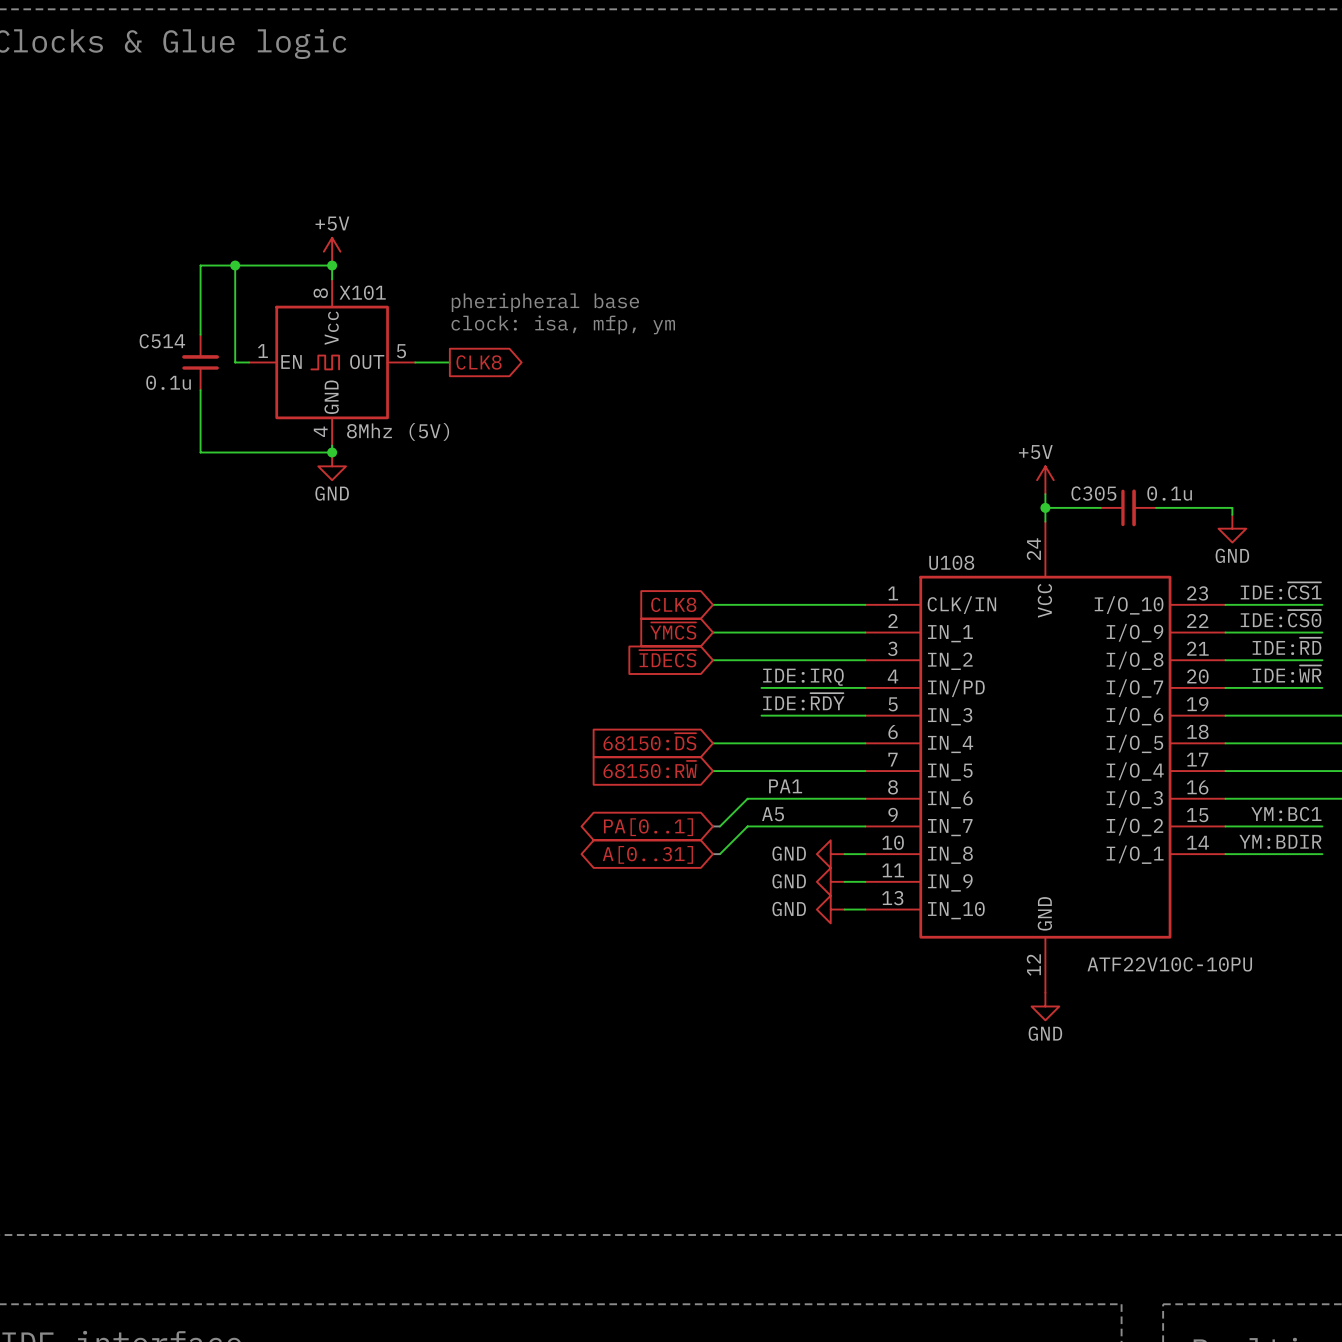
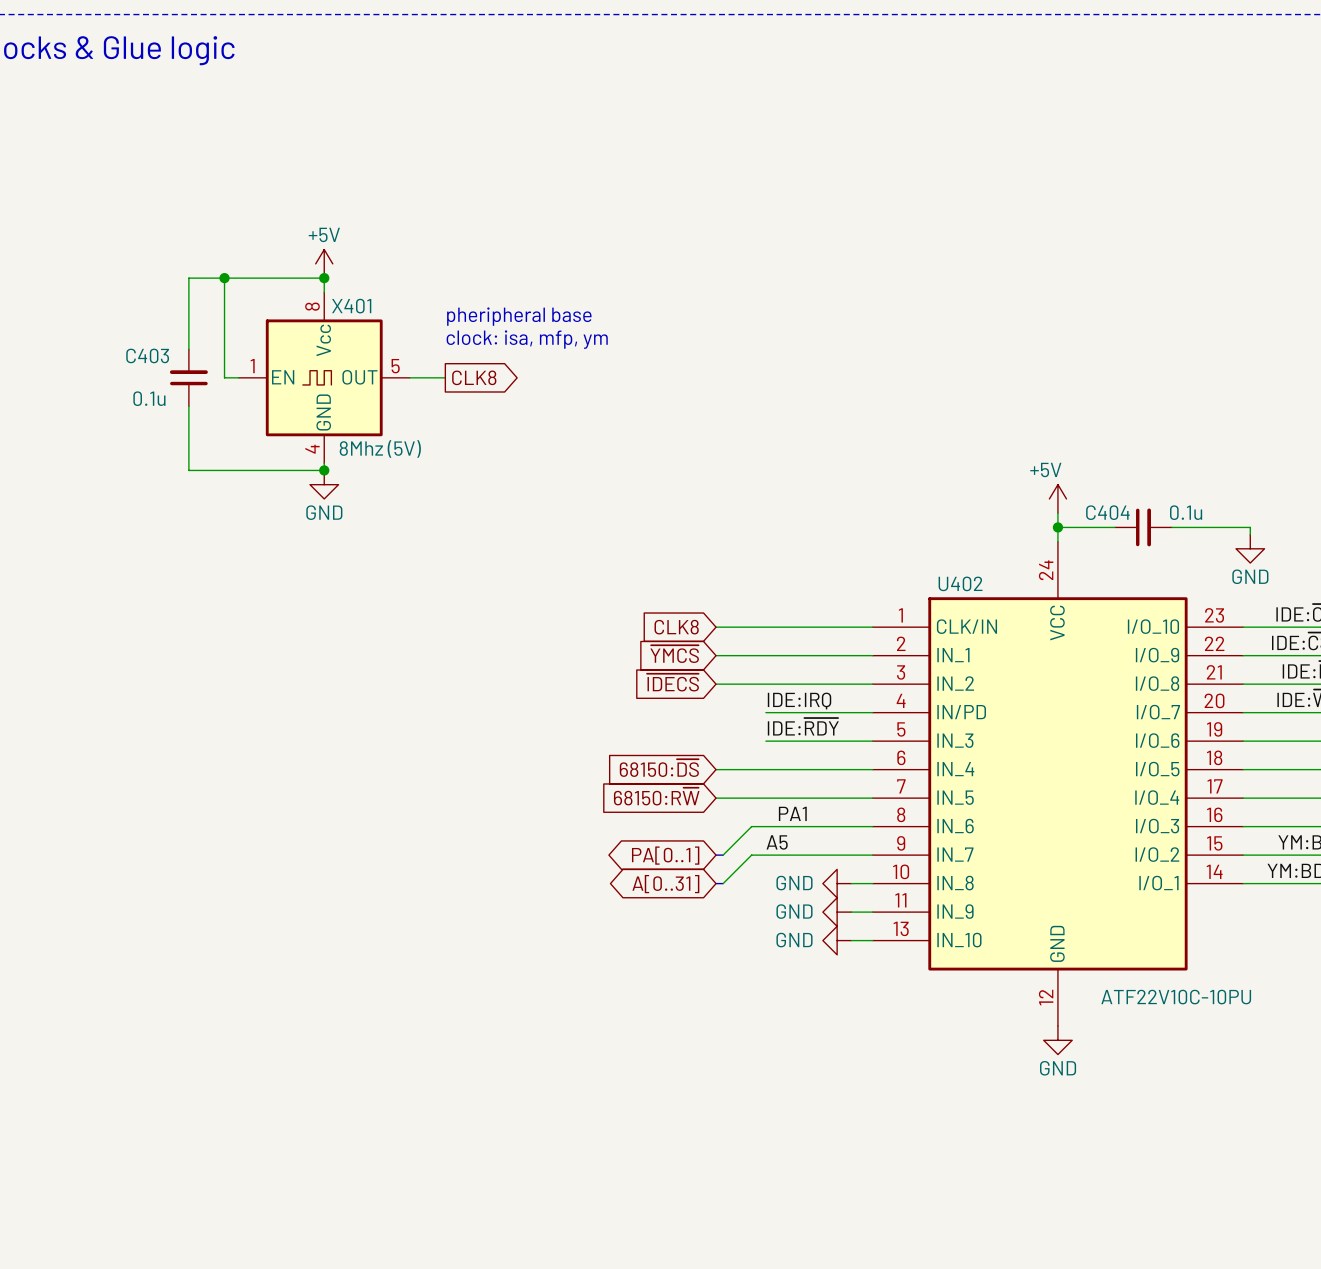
X101 name: X101 (362, 292) -> X401 (351, 306)
C514 name: C514 (162, 341) -> C403 (147, 355)
C305 name: C305 (1093, 493) -> C404 (1107, 512)
U108 name: U108 (951, 562) -> U402 (960, 583)

